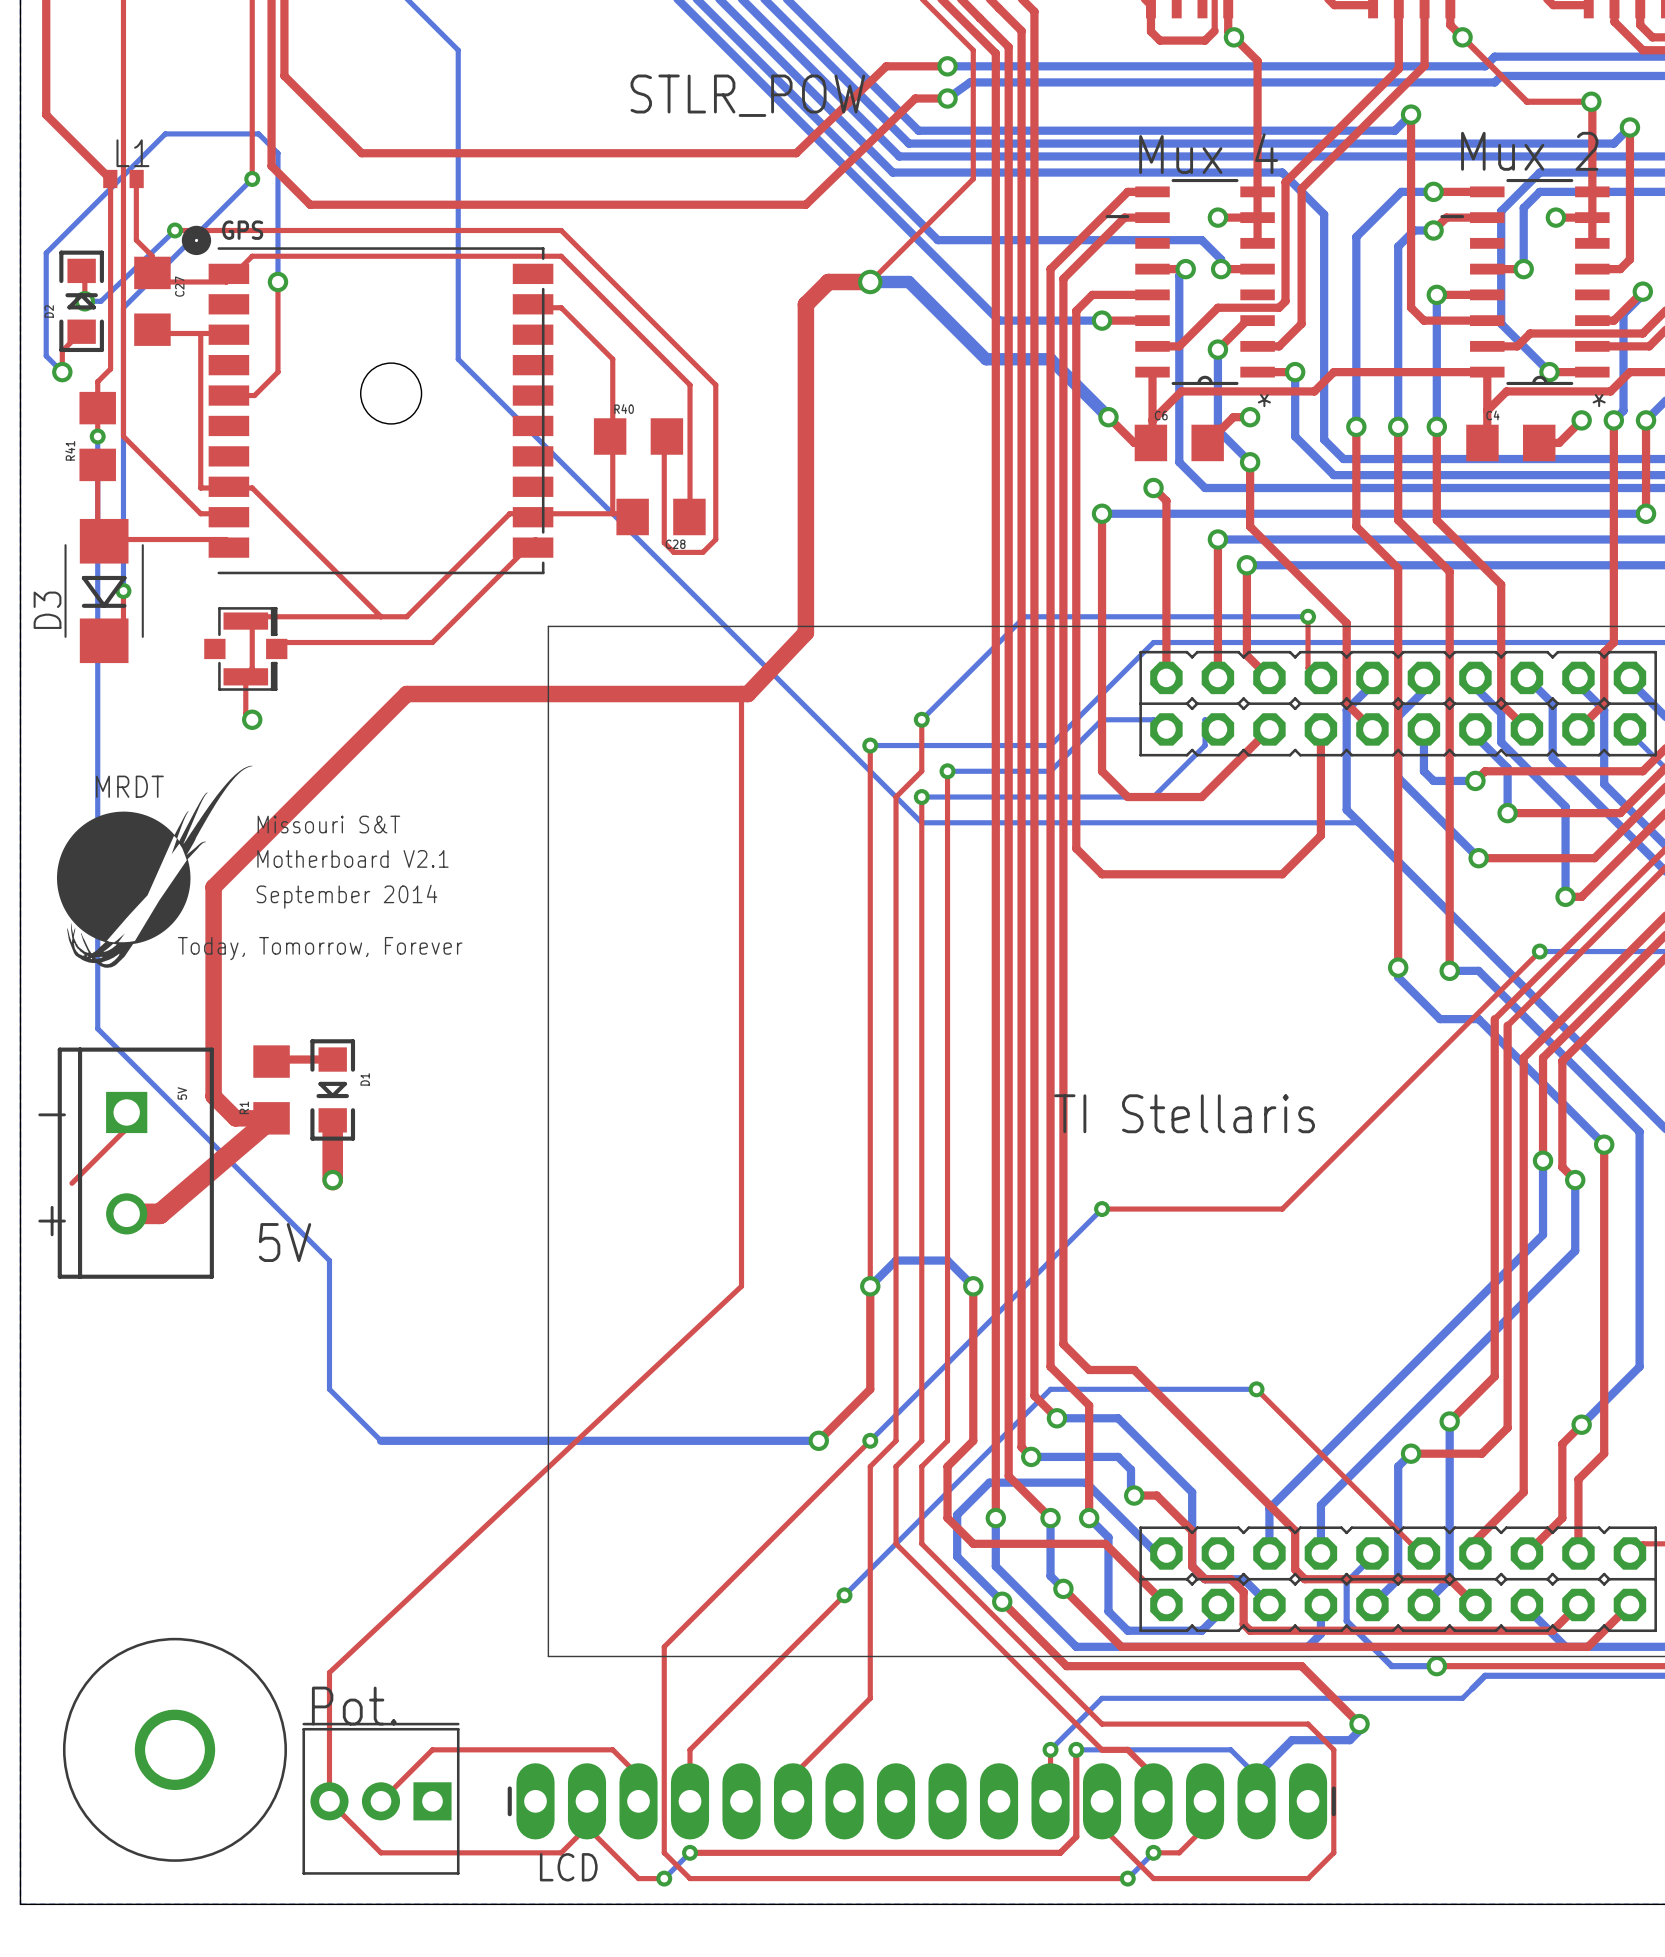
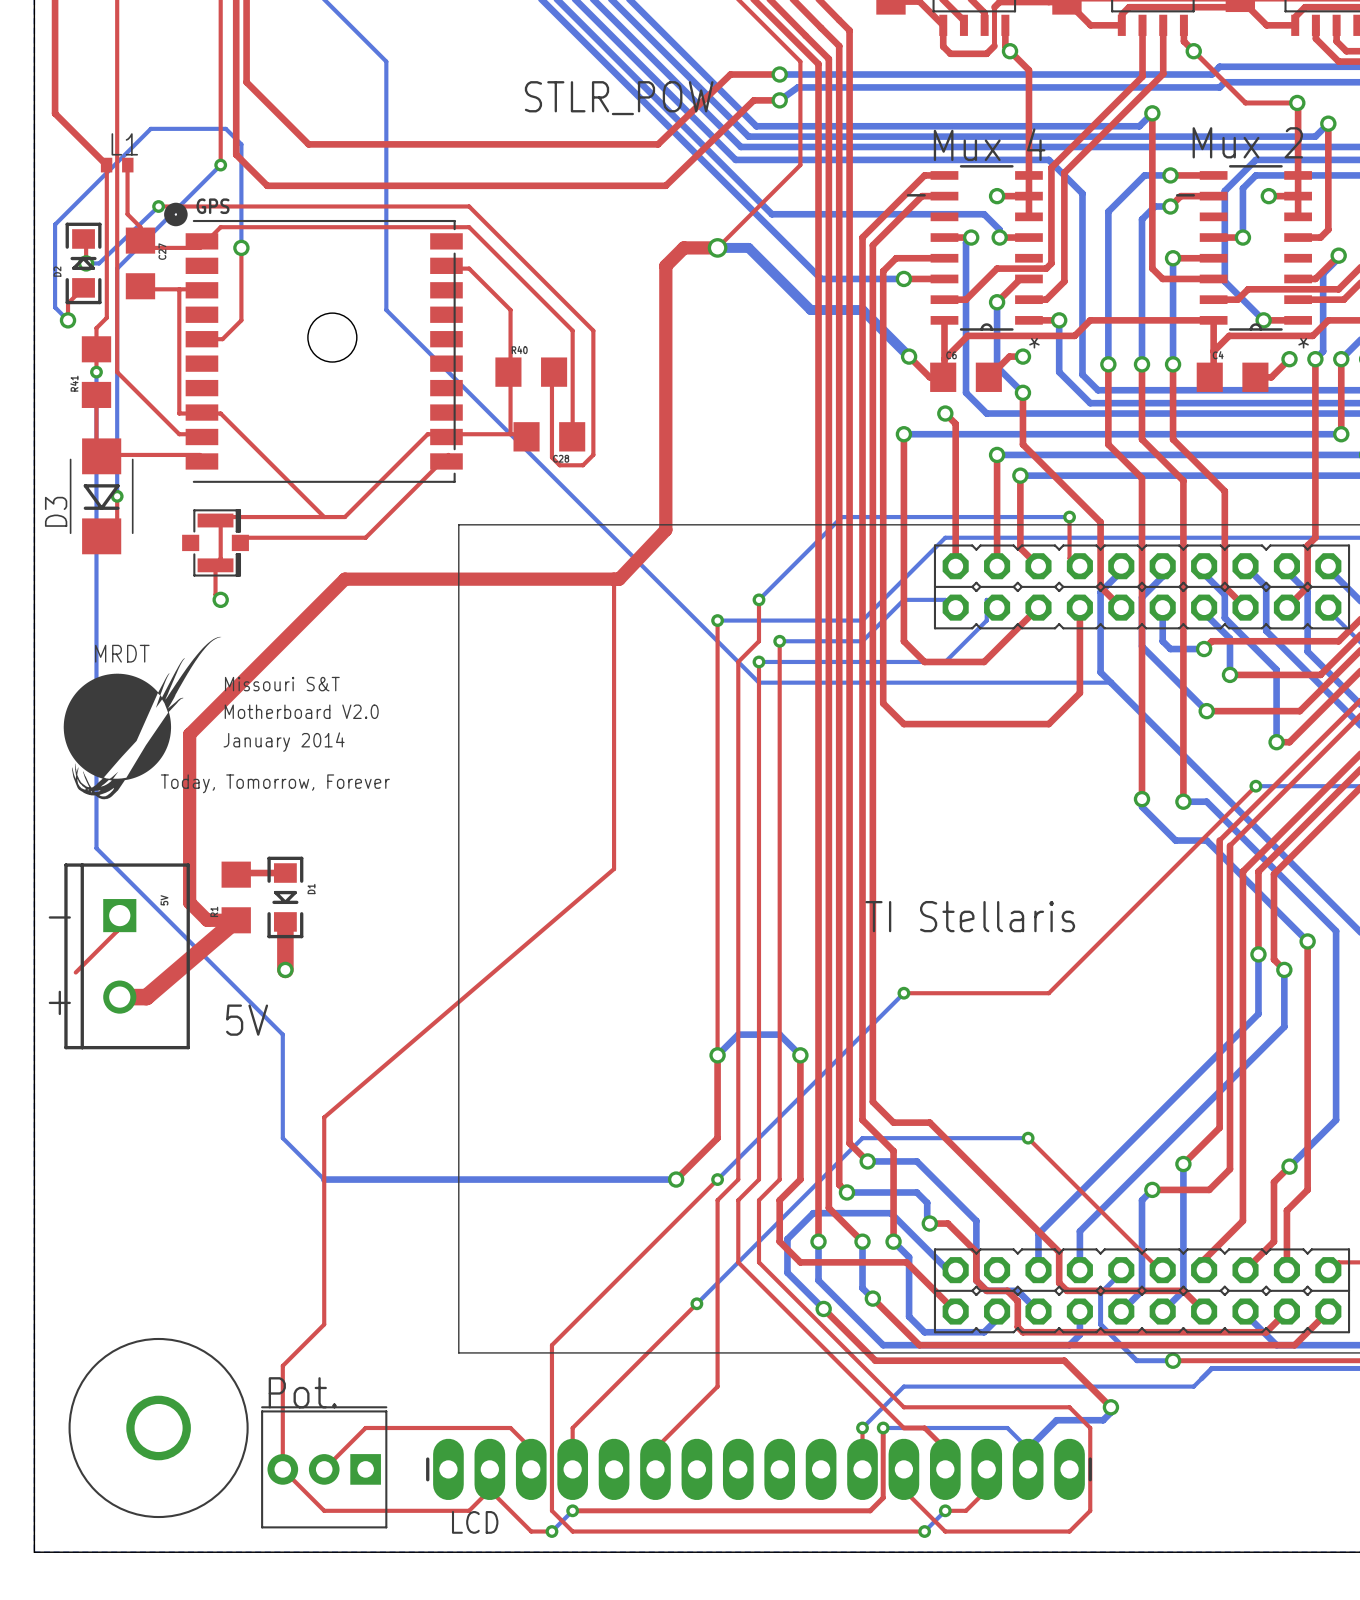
text: Motherboard V2.1 (352, 858) -> Motherboard V2.0 (301, 711)
text: September 2014 (346, 896) -> January 2014 (284, 742)
top track: (741, 1054) (741, 1286) (329, 1672) -> (614, 869) (324, 1117) (324, 1324) (282, 1365)

